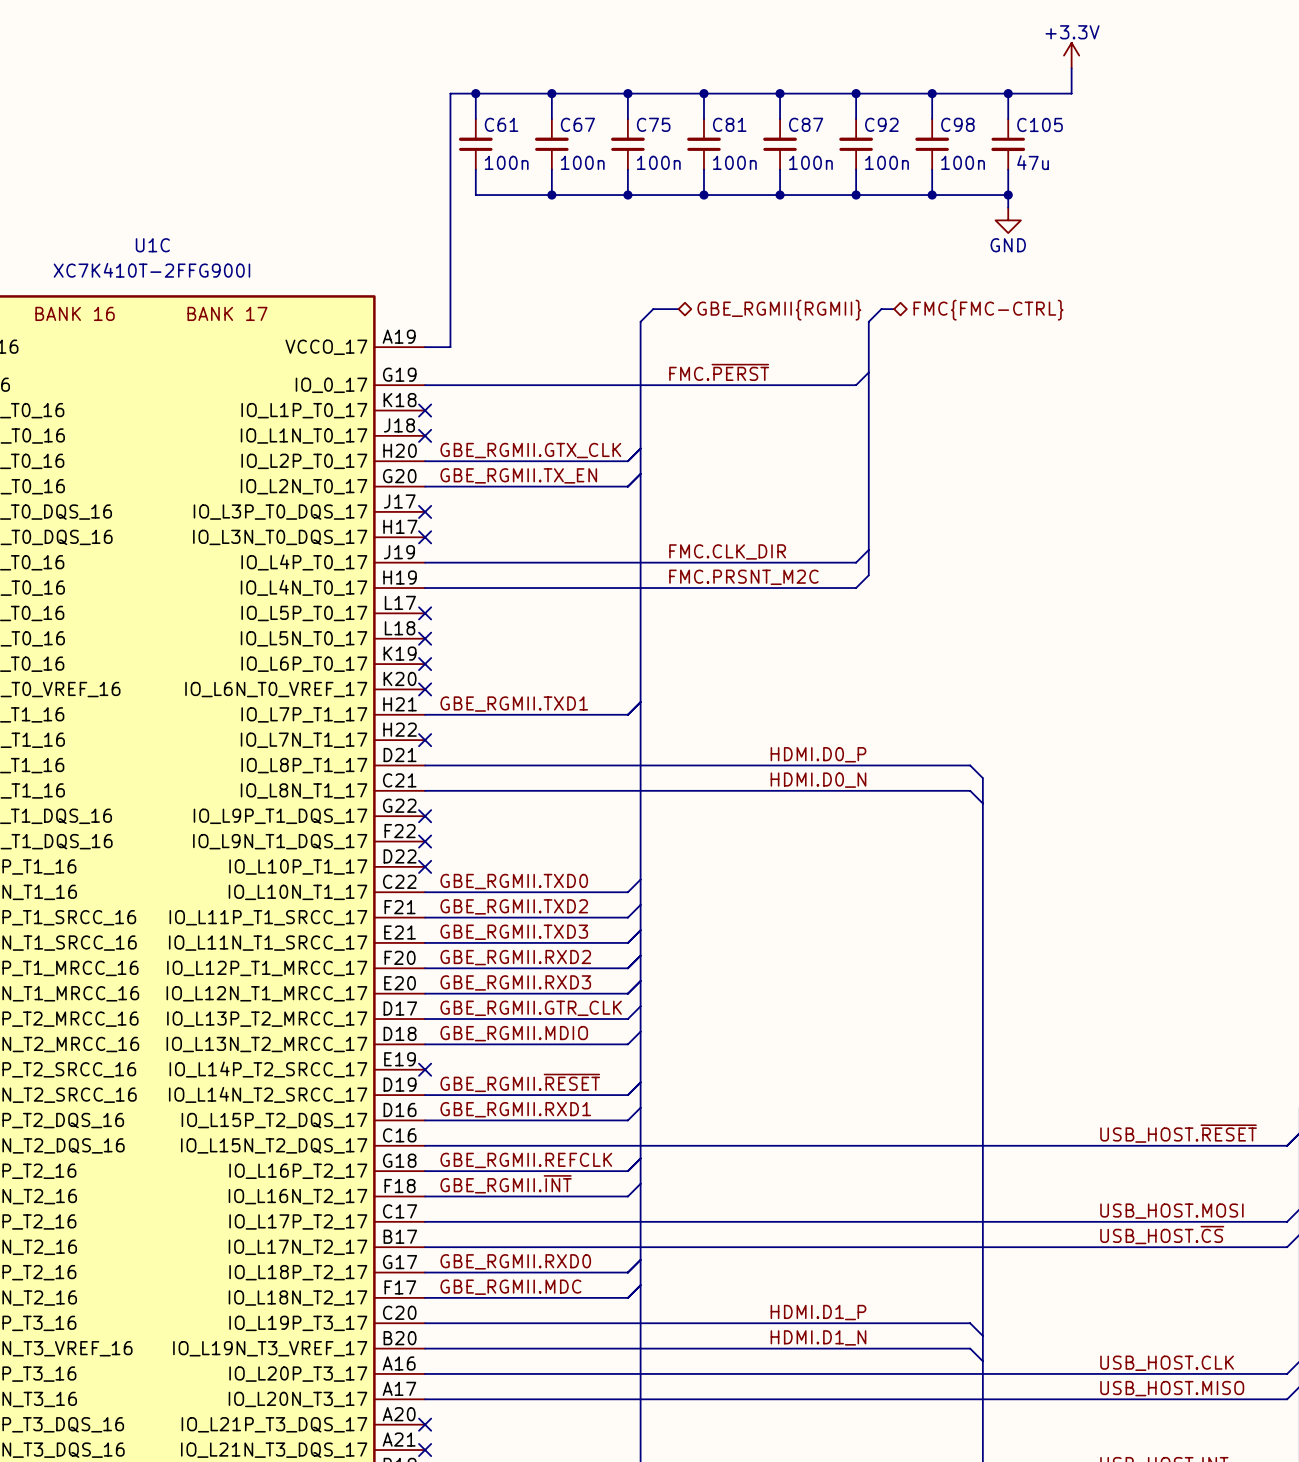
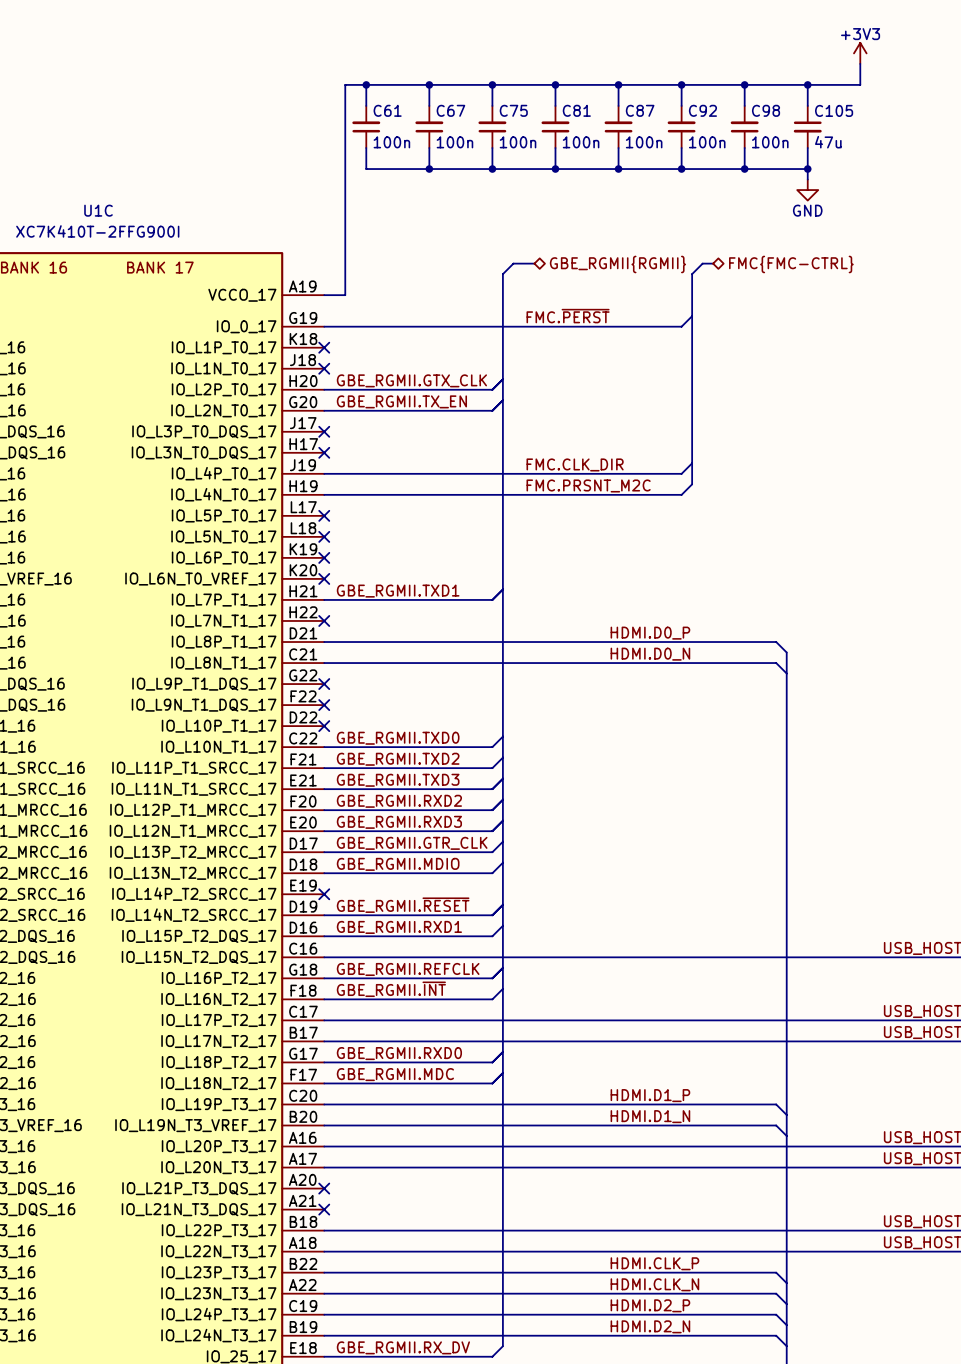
power symbol: +3.3V (1071, 55) -> +3V3 (860, 53)

